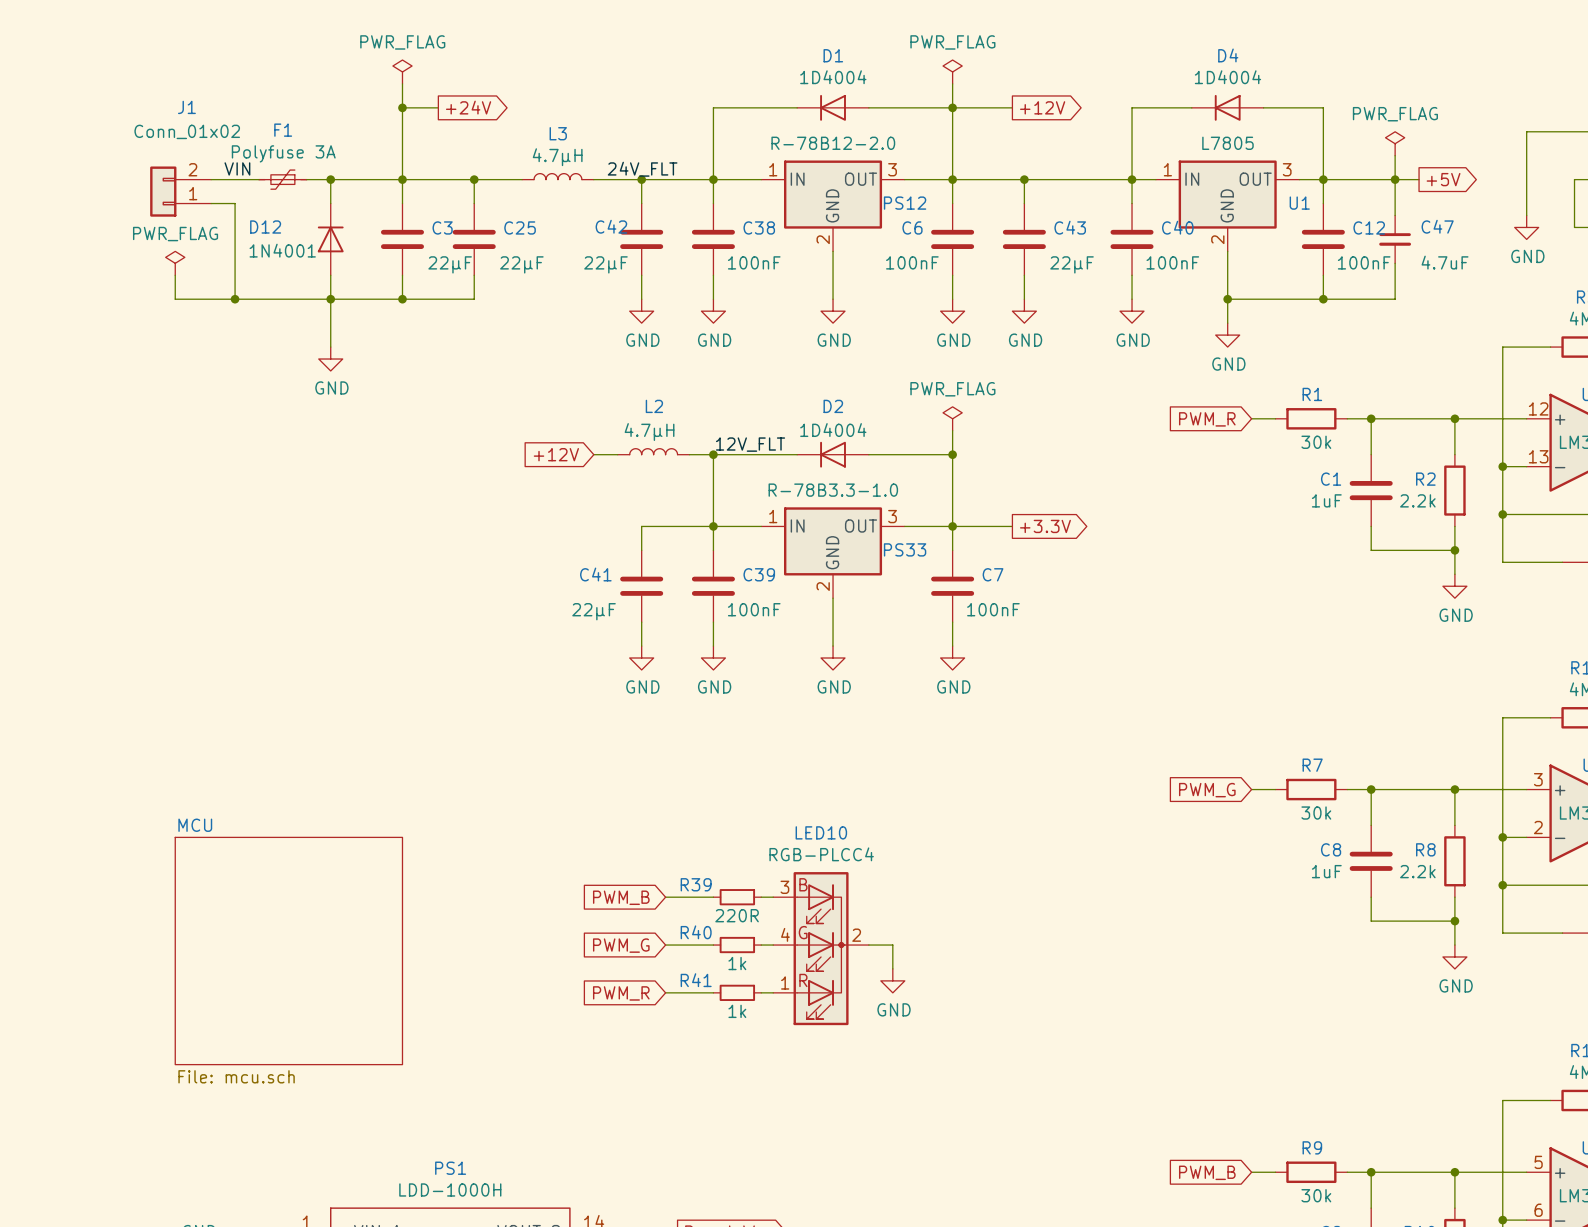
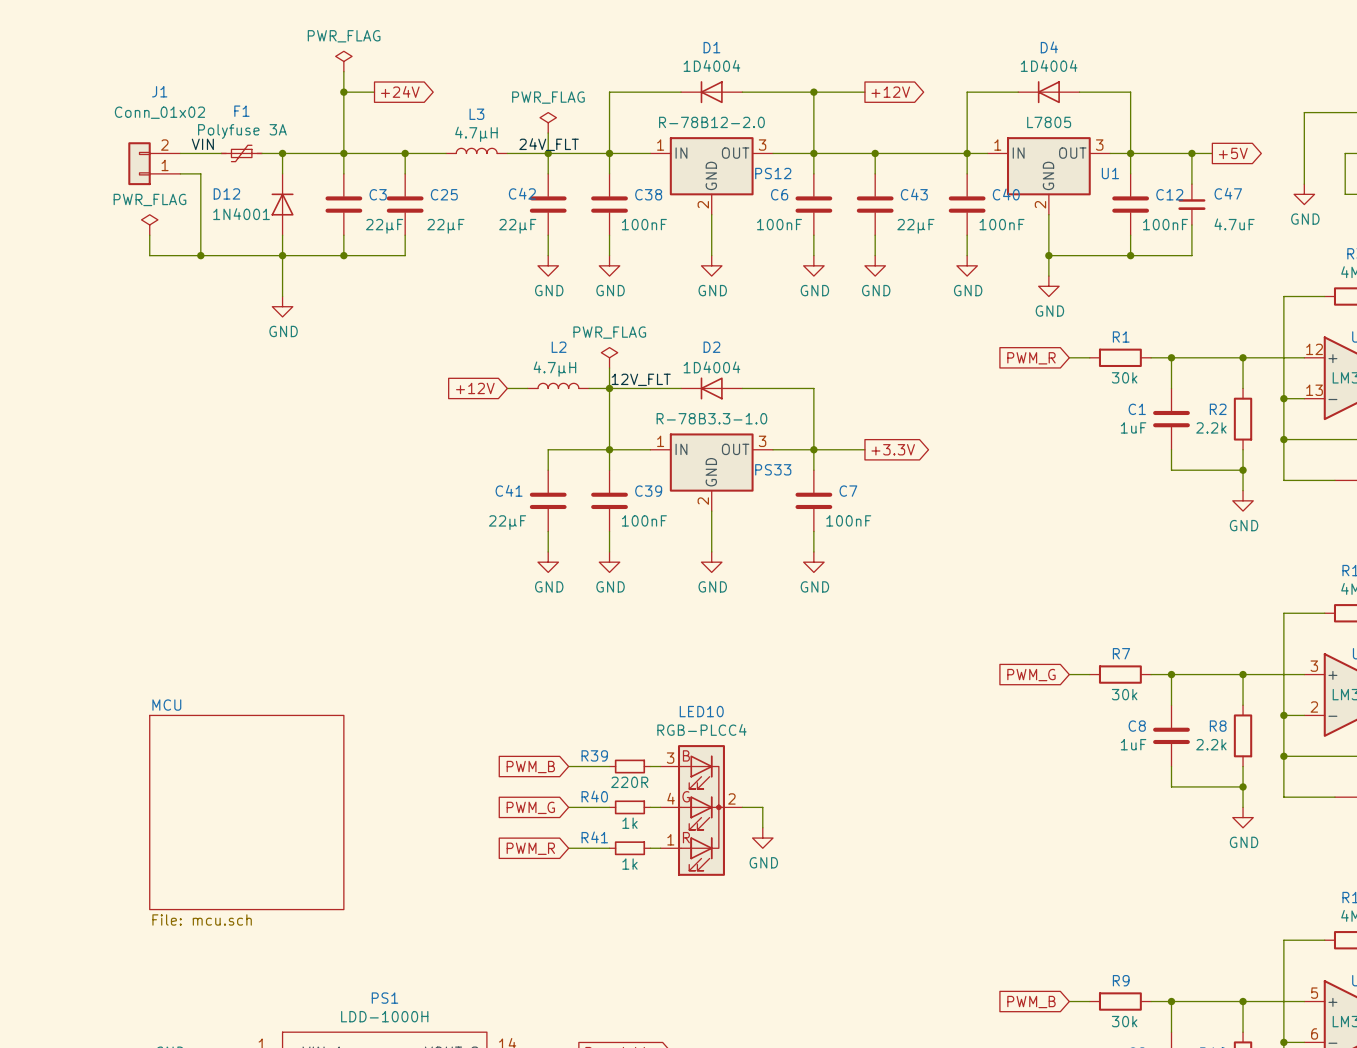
power symbol: PWR_FLAG (952, 71) -> none
wire: (952, 83) (952, 107) -> none
power symbol: none -> PWR_FLAG (548, 122)
power symbol: PWR_FLAG (1395, 143) -> none
wire: none -> (548, 133) (548, 153)
wire: (1395, 155) (1395, 179) -> none
power symbol: none -> PWR_FLAG (609, 357)
power symbol: PWR_FLAG (952, 418) -> none
wire: none -> (609, 368) (609, 388)
wire: (952, 430) (952, 454) -> none
junction: (952, 454) -> none

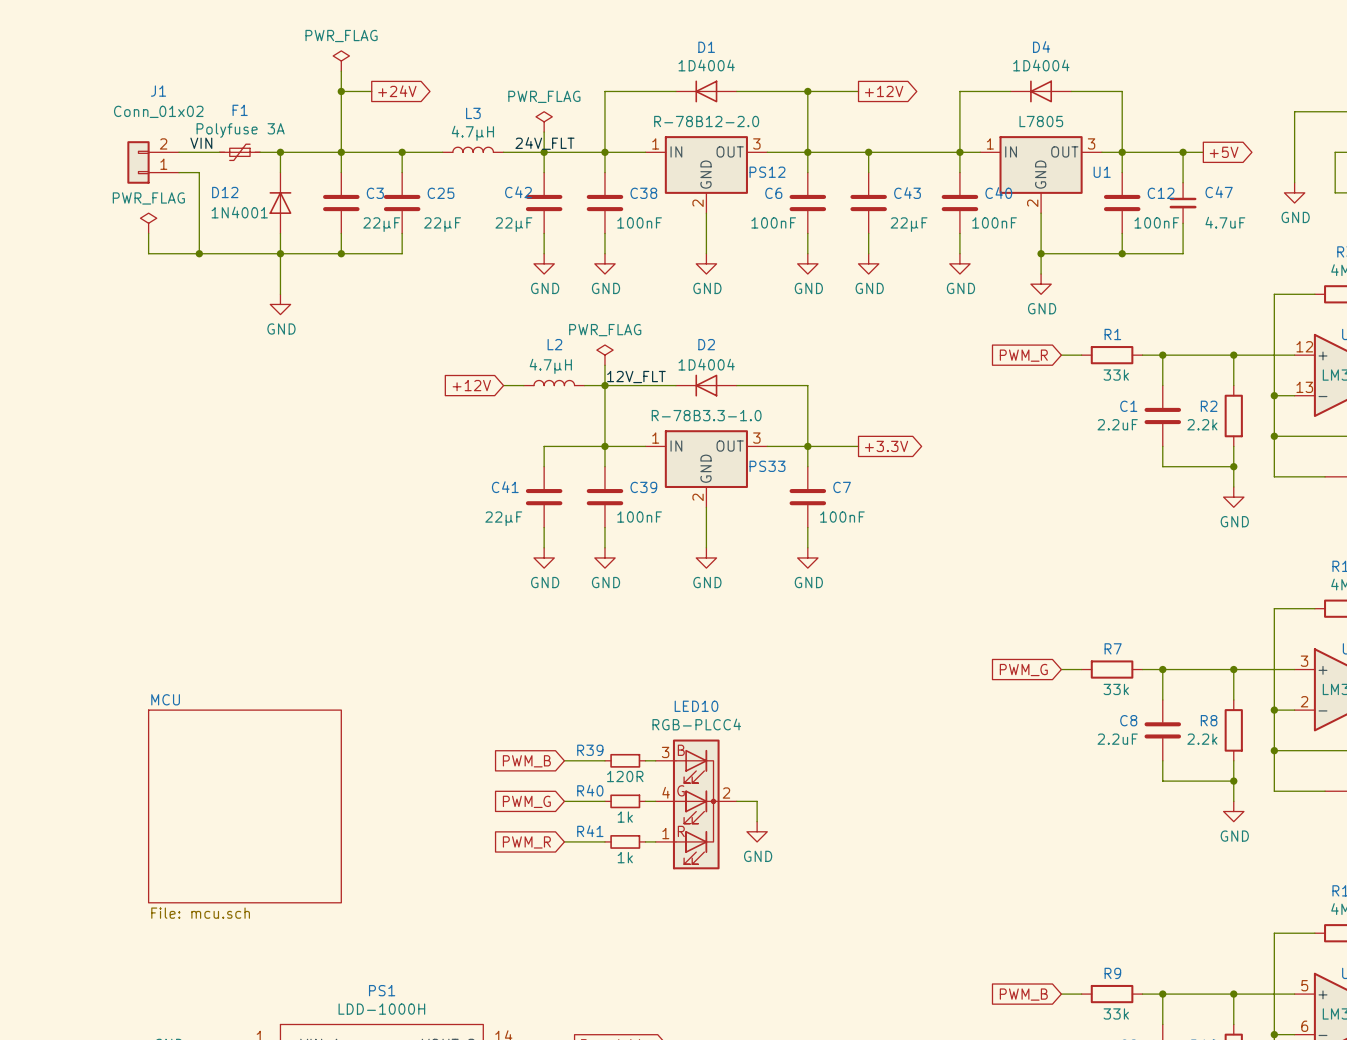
R1 value: 30k (1124, 377) -> 33k (1116, 375)
C1 value: 1uF (1133, 427) -> 2.2uF (1117, 424)
R7 value: 30k (1124, 694) -> 33k (1116, 689)
C8 value: 1uF (1133, 744) -> 2.2uF (1117, 739)
R39 value: 220R (629, 782) -> 120R (625, 776)
R9 value: 30k (1124, 1021) -> 33k (1116, 1013)

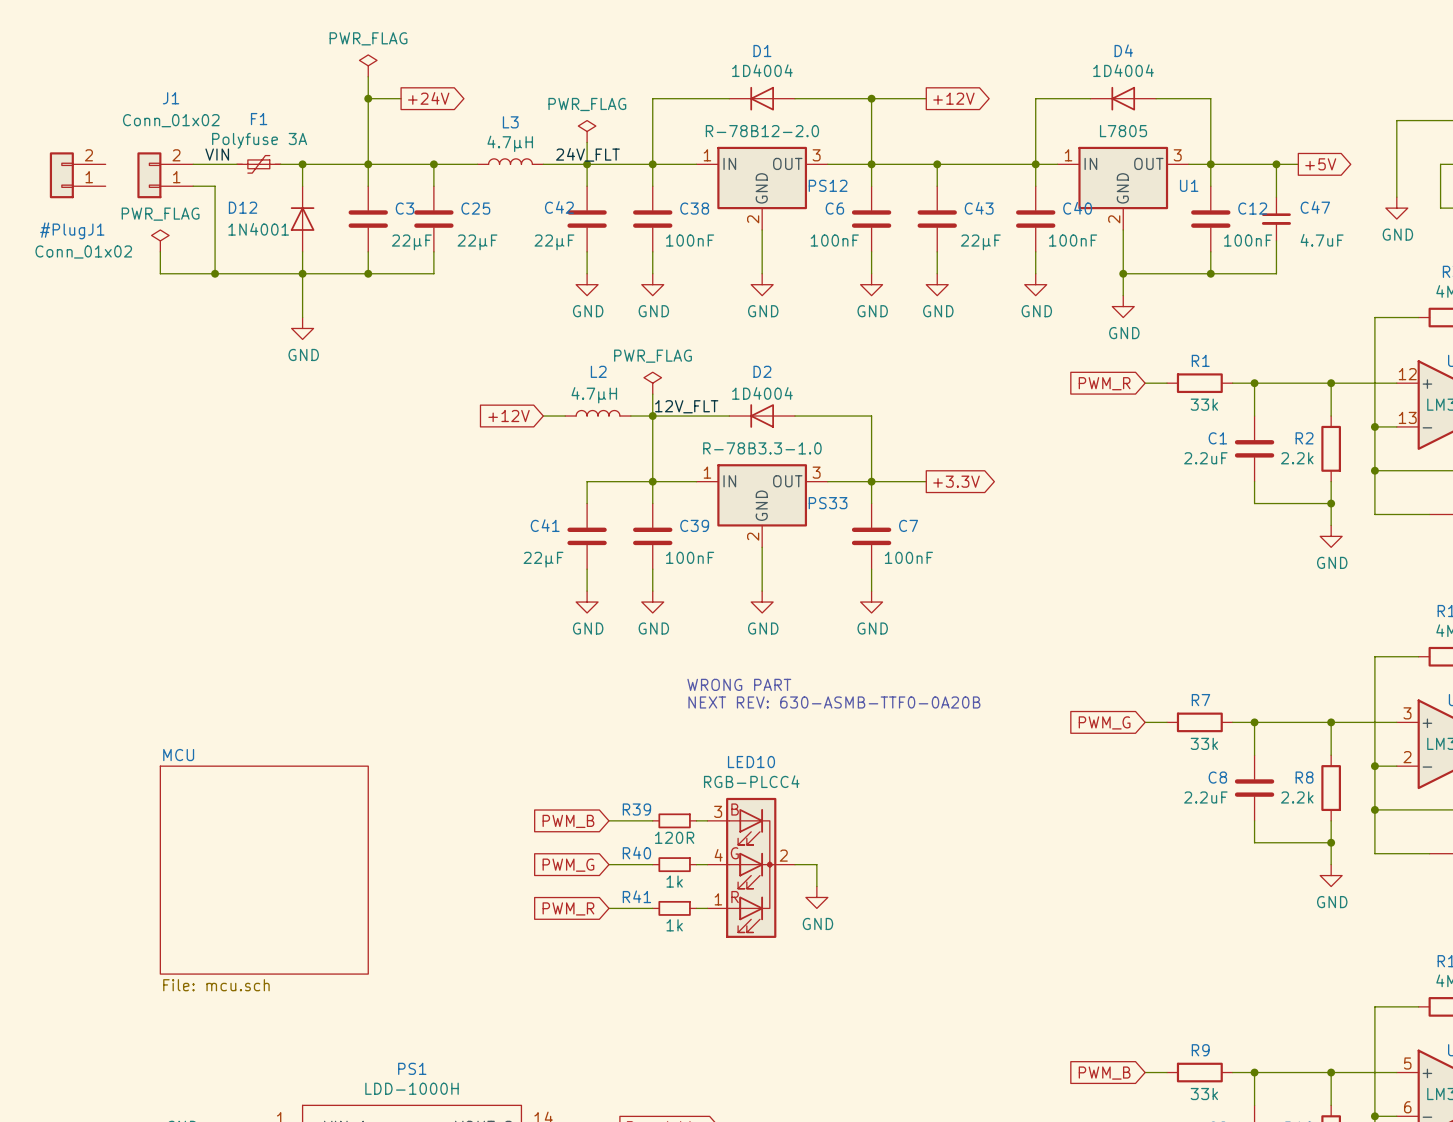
#PlugJ1: none -> Conn_01x02 (77, 175)
text: none -> WRONG PART (739, 684)
text: none -> NEXT REV: 630-ASMB-TTF0-0A20B (834, 702)

